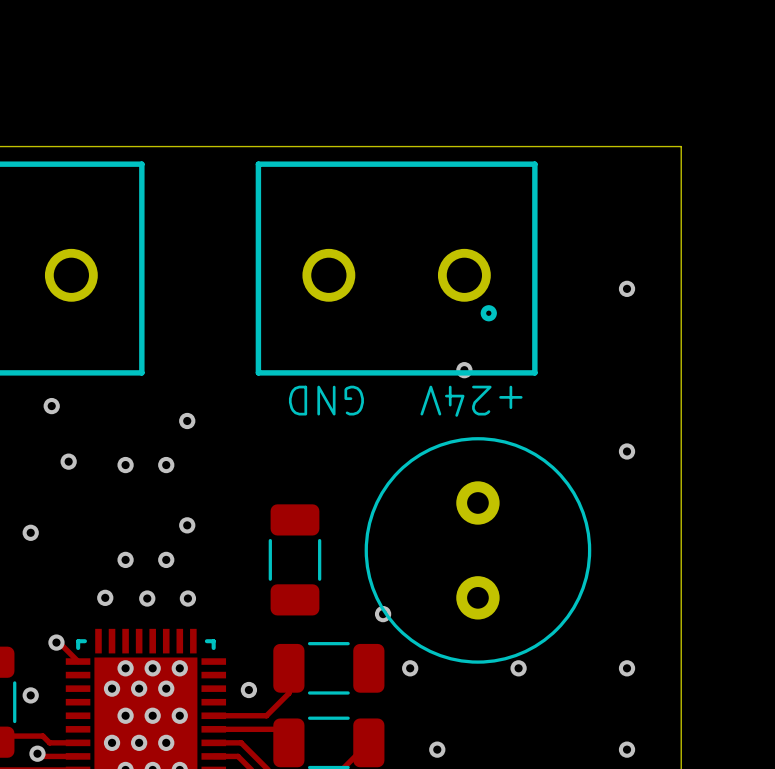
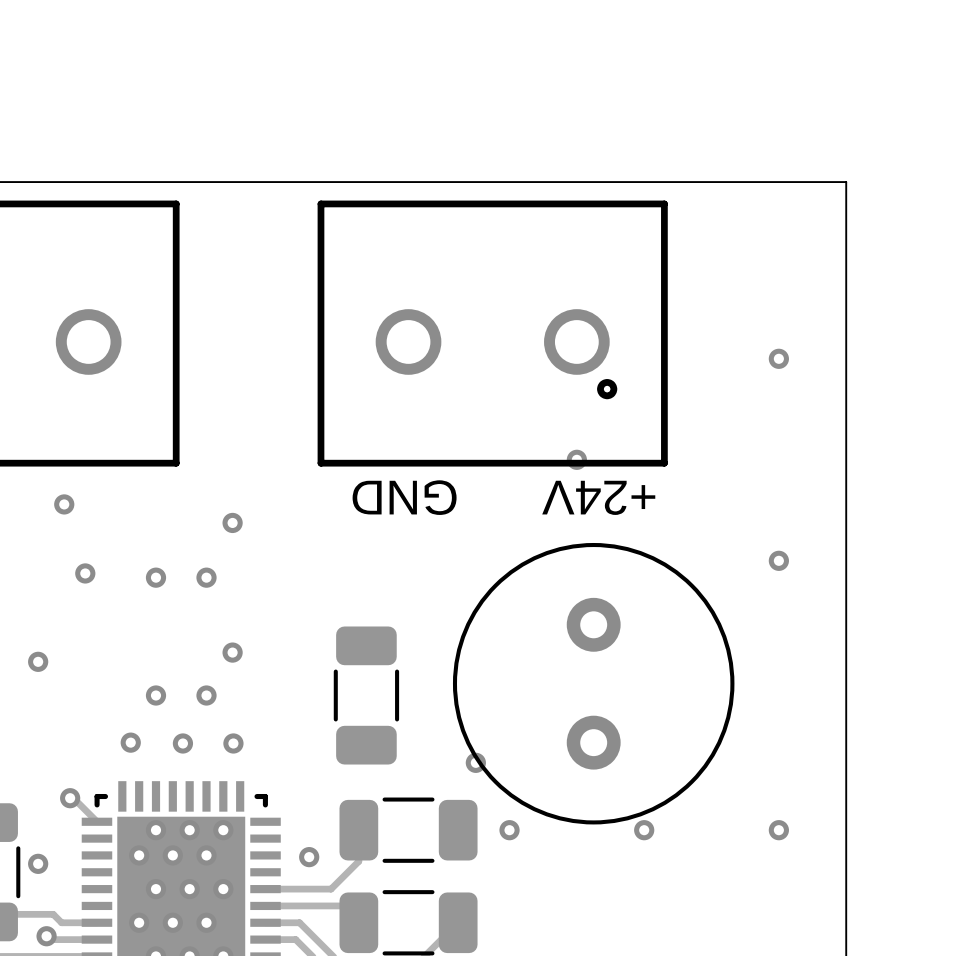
via: (437, 749) -> none
via: (627, 749) -> none

